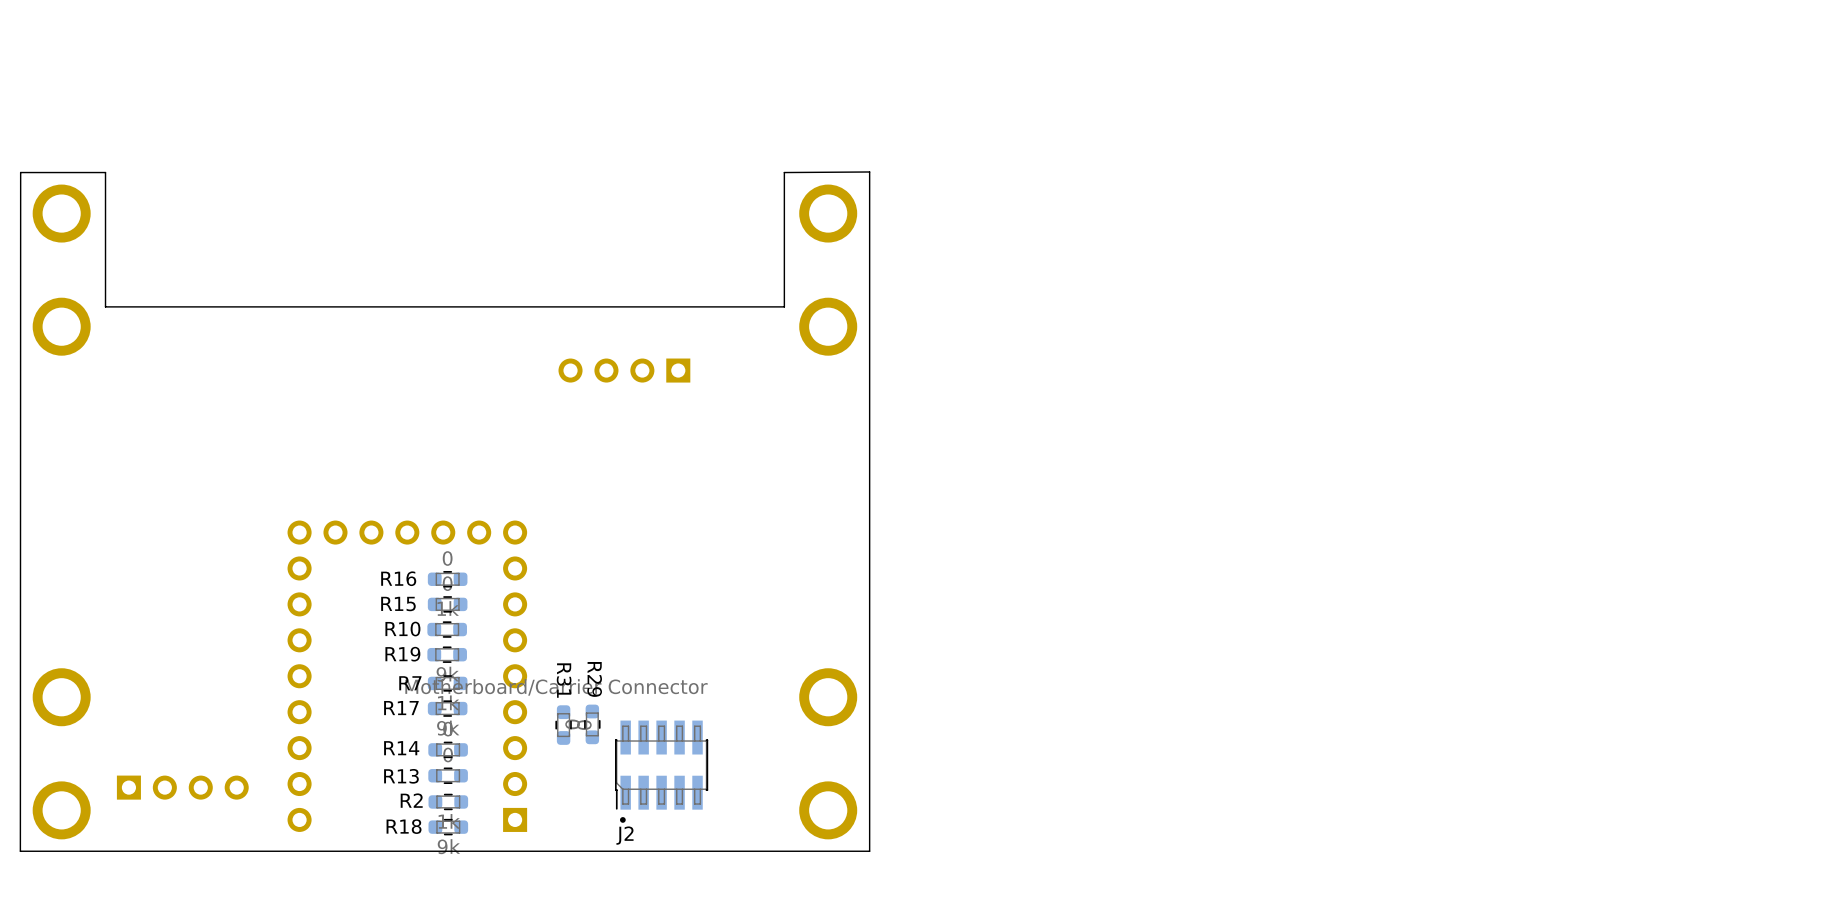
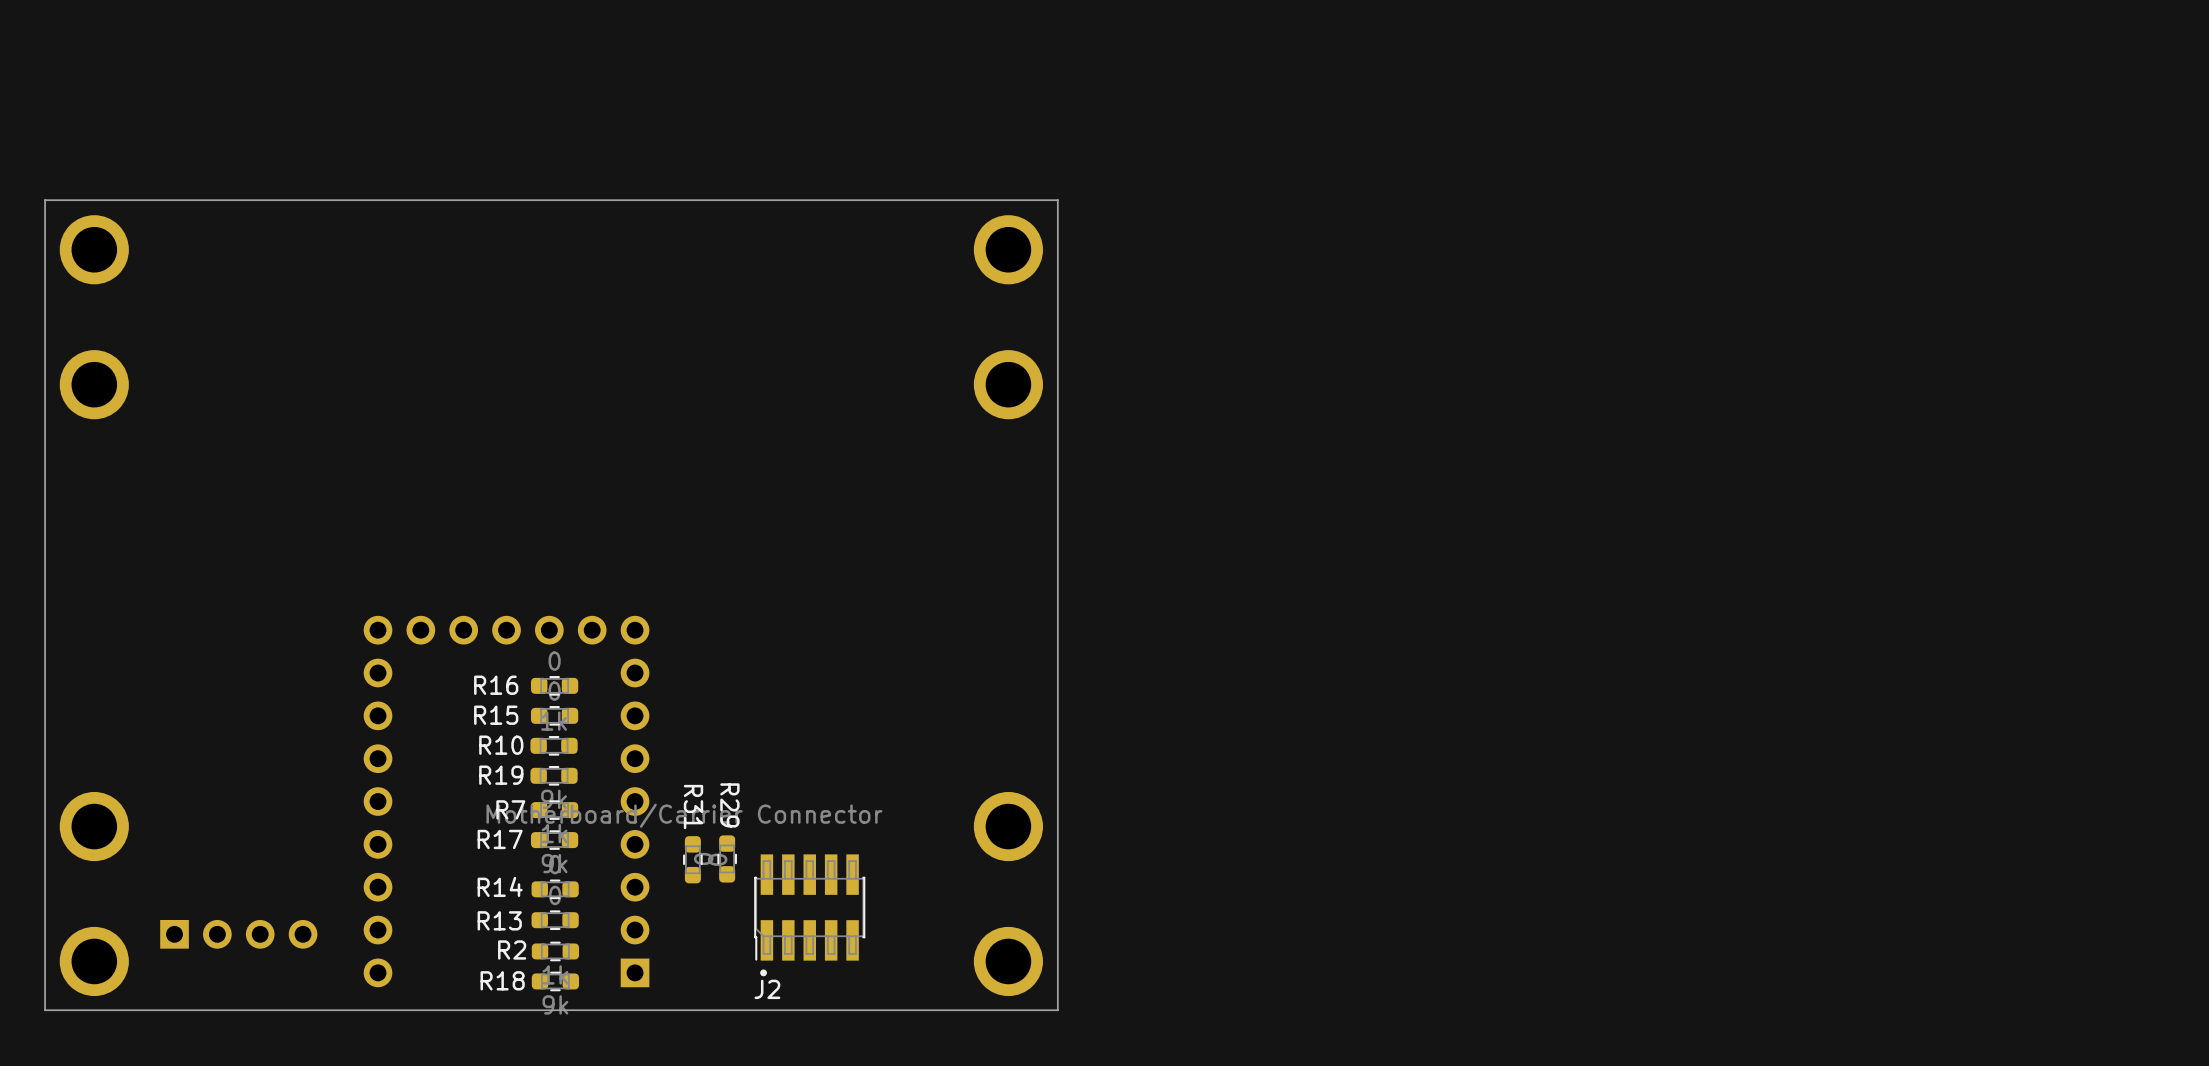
board edge: (869, 171) (784, 172) (784, 306) (105, 306) (105, 172) (20, 172) (20, 851) -> (1057, 200) (45, 200) (45, 1010)
part: (624, 370) -> none

